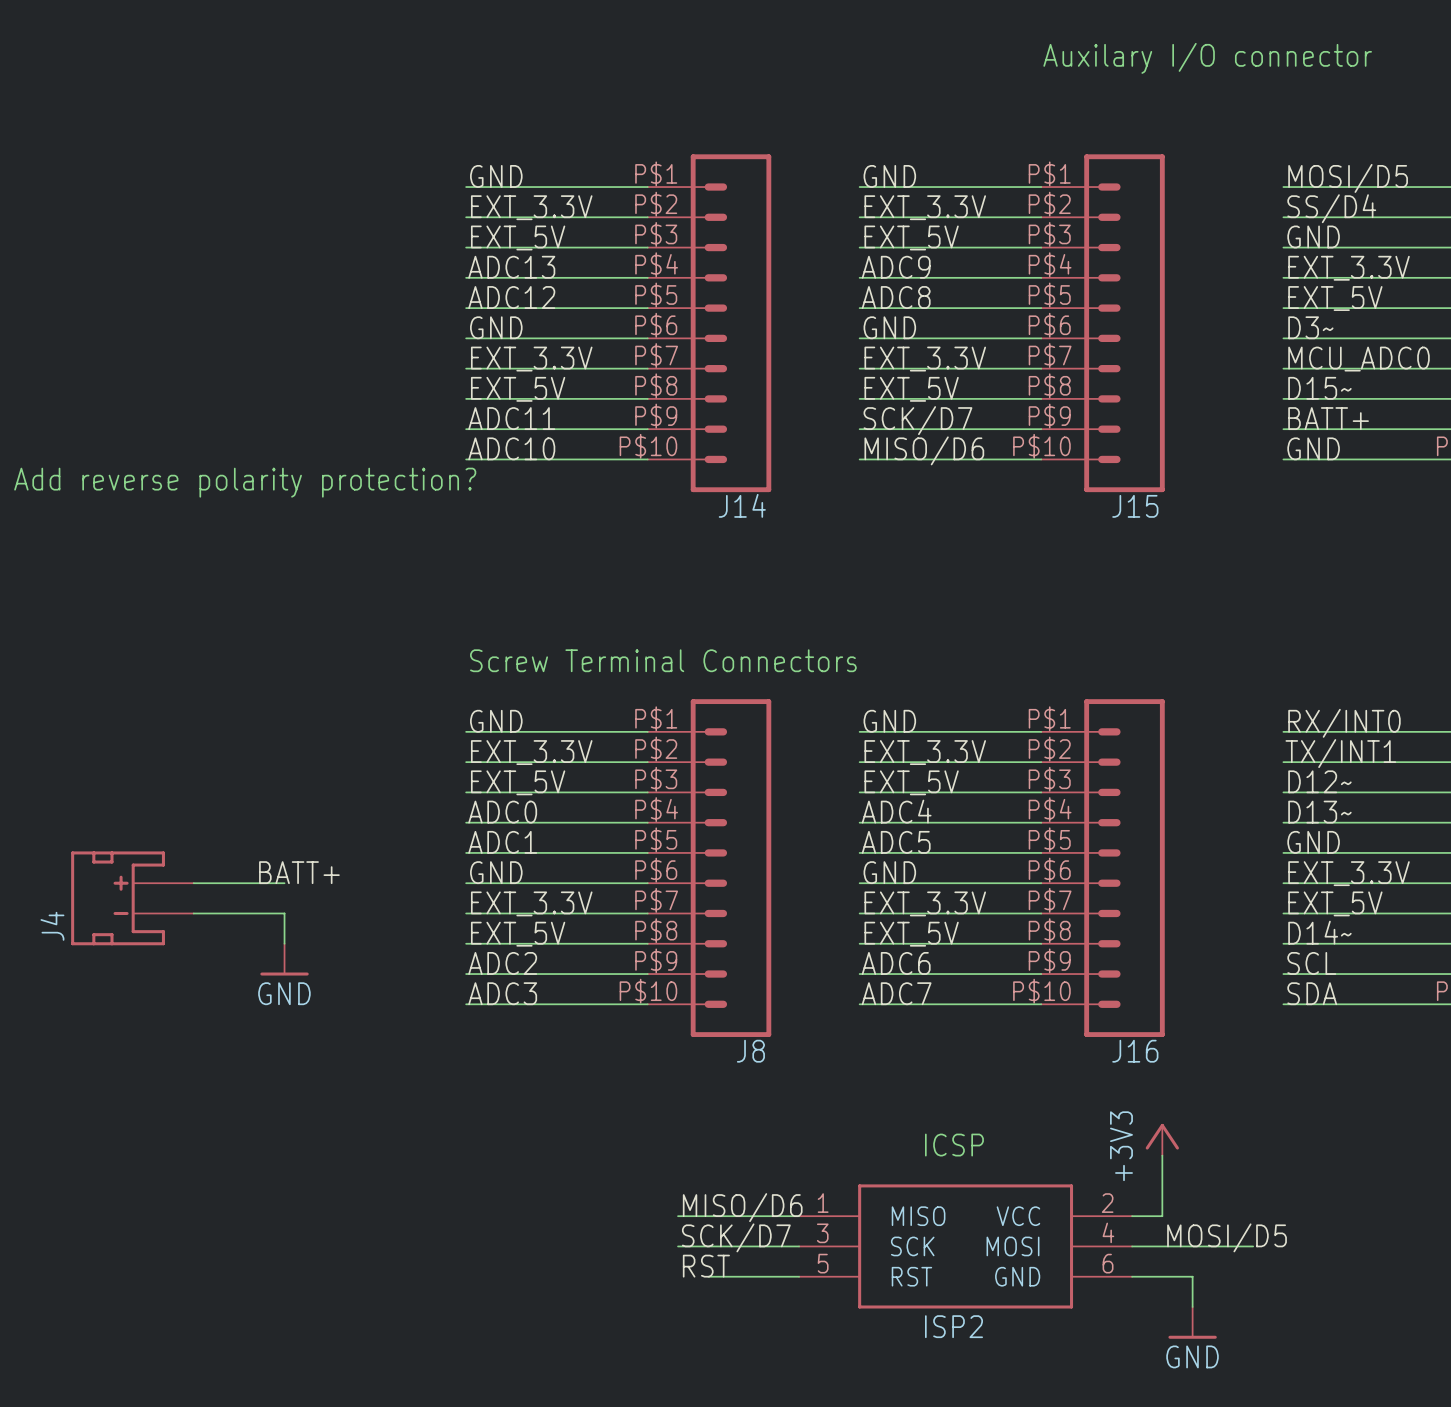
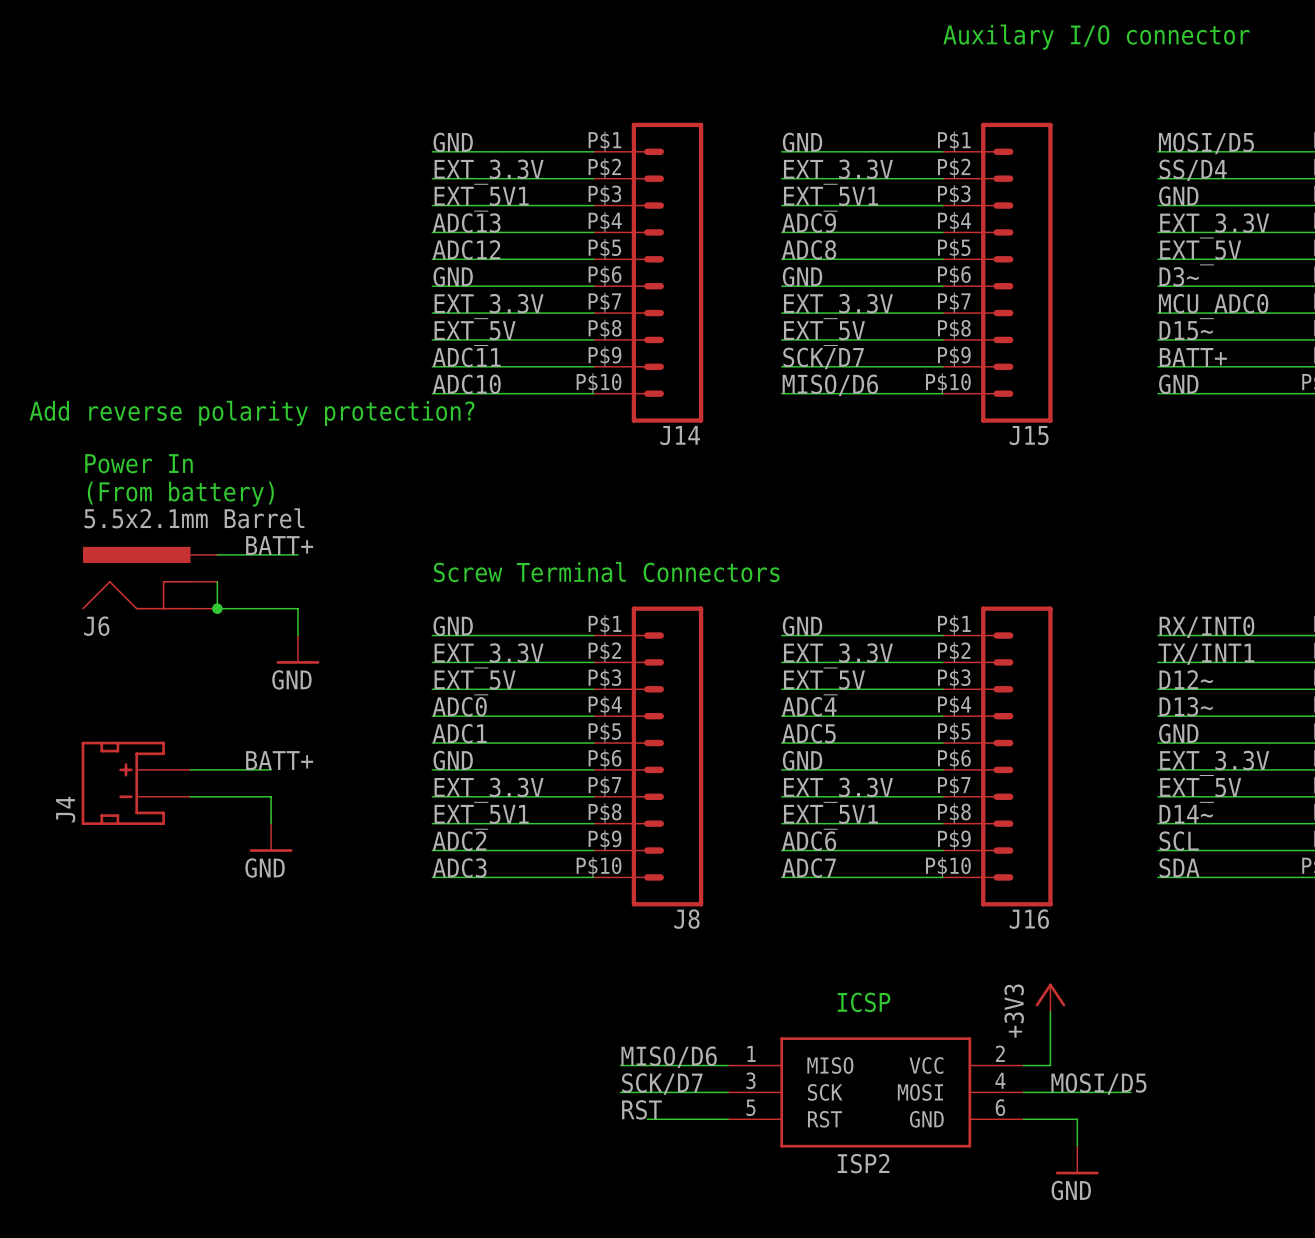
label: EXT_5V (518, 237) -> EXT_5V1 (481, 199)
label: EXT_5V (911, 237) -> EXT_5V1 (830, 199)
text: none -> Power In (138, 463)
text: none -> (From battery) (180, 494)
label: none -> BATT+ (279, 545)
wire: none -> (217, 554) (297, 554)
J6: none -> 5.5x2.1mm Barrel (149, 578)
wire: none -> (217, 581) (217, 608) (297, 608) (297, 635)
junction: none -> (217, 608)
power symbol: none -> GND (297, 649)
label: EXT_5V (518, 934) -> EXT_5V1 (481, 817)
label: EXT_5V (911, 934) -> EXT_5V1 (830, 817)

